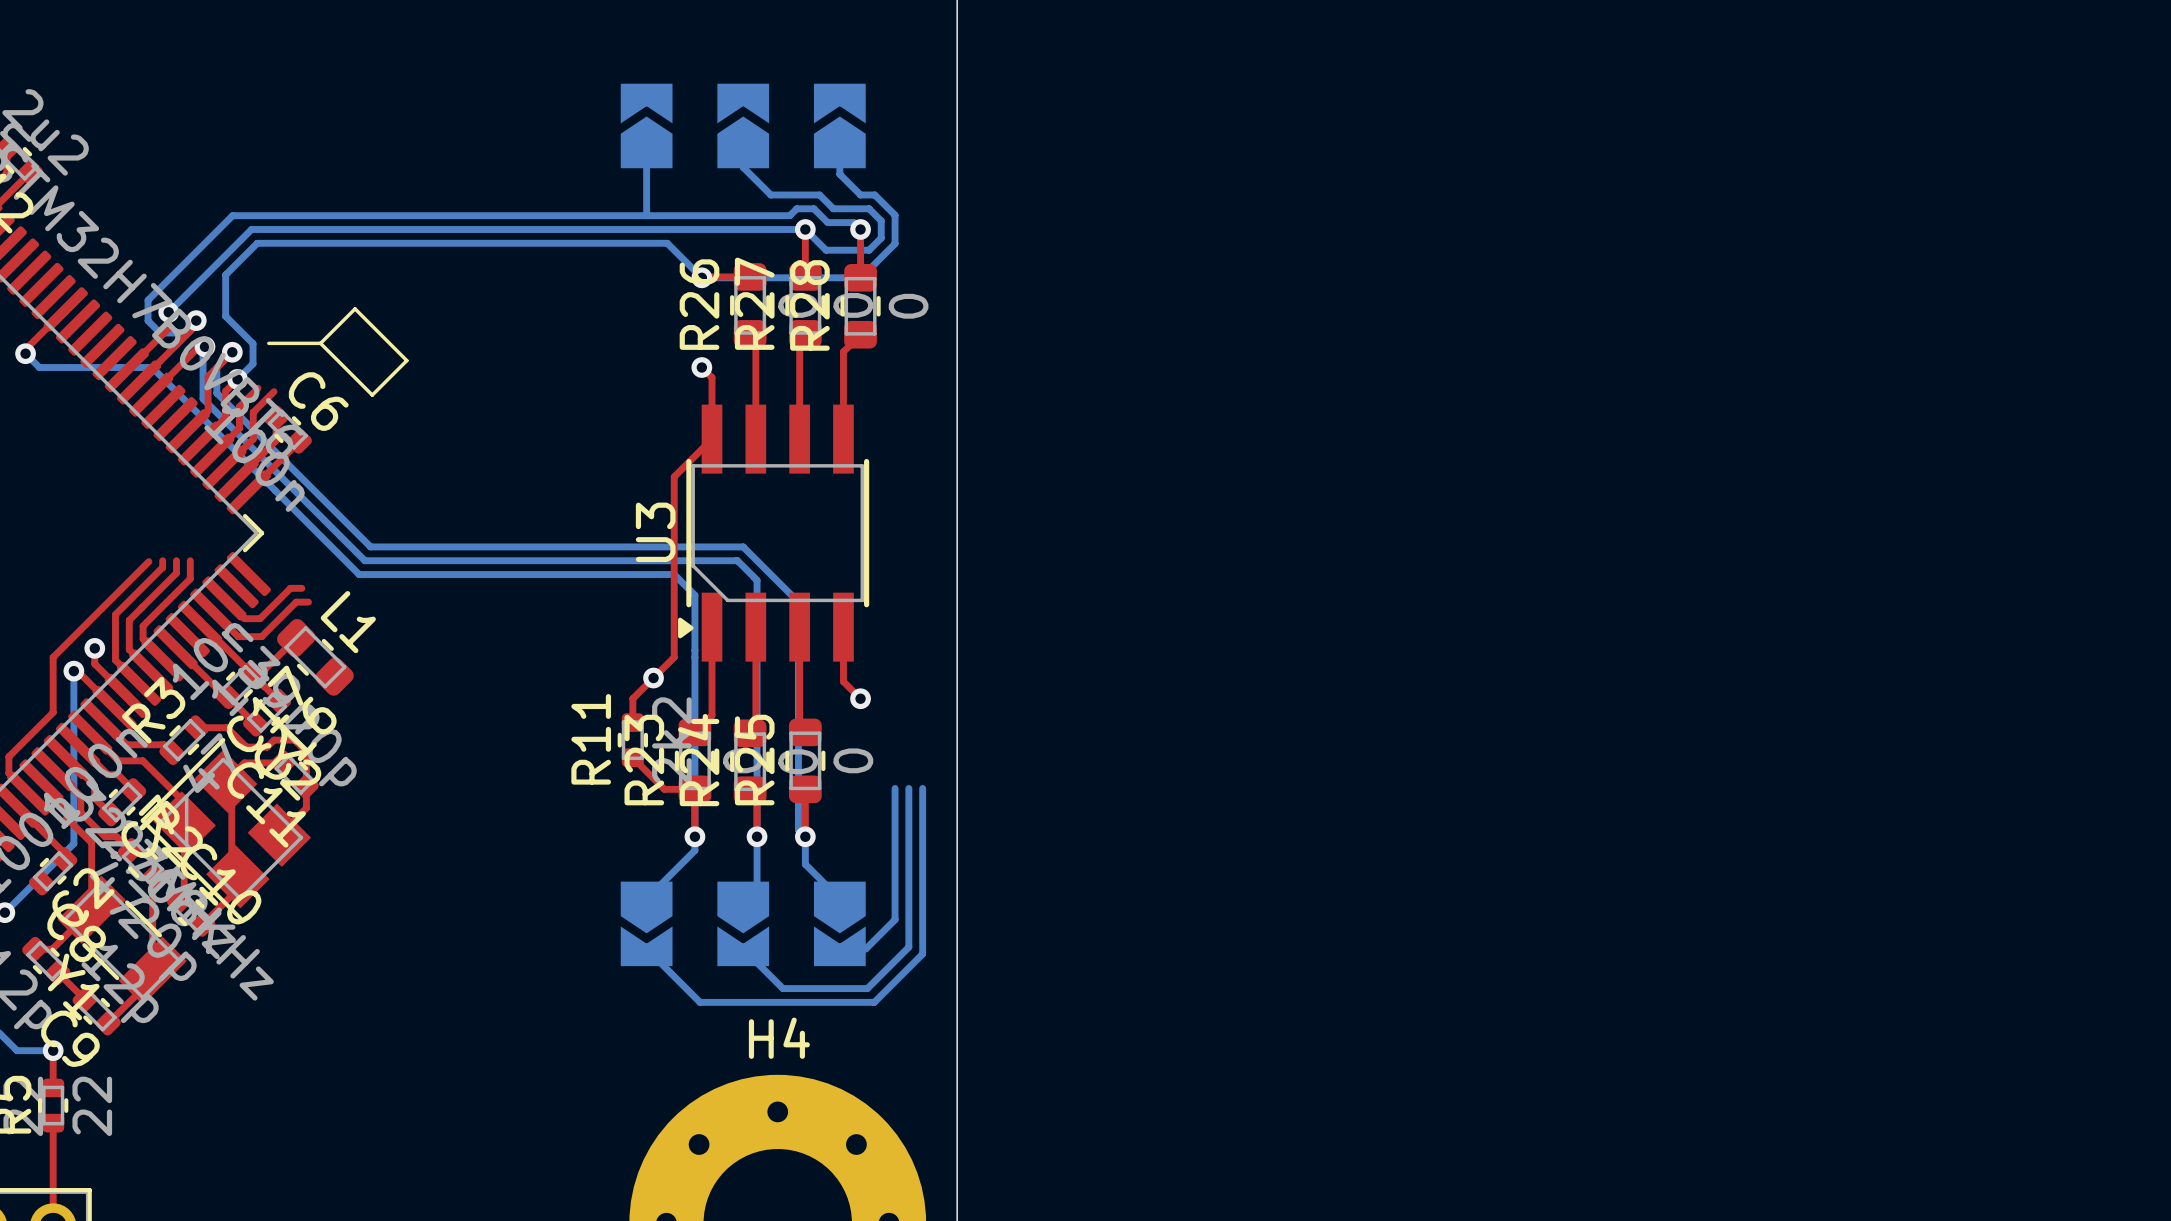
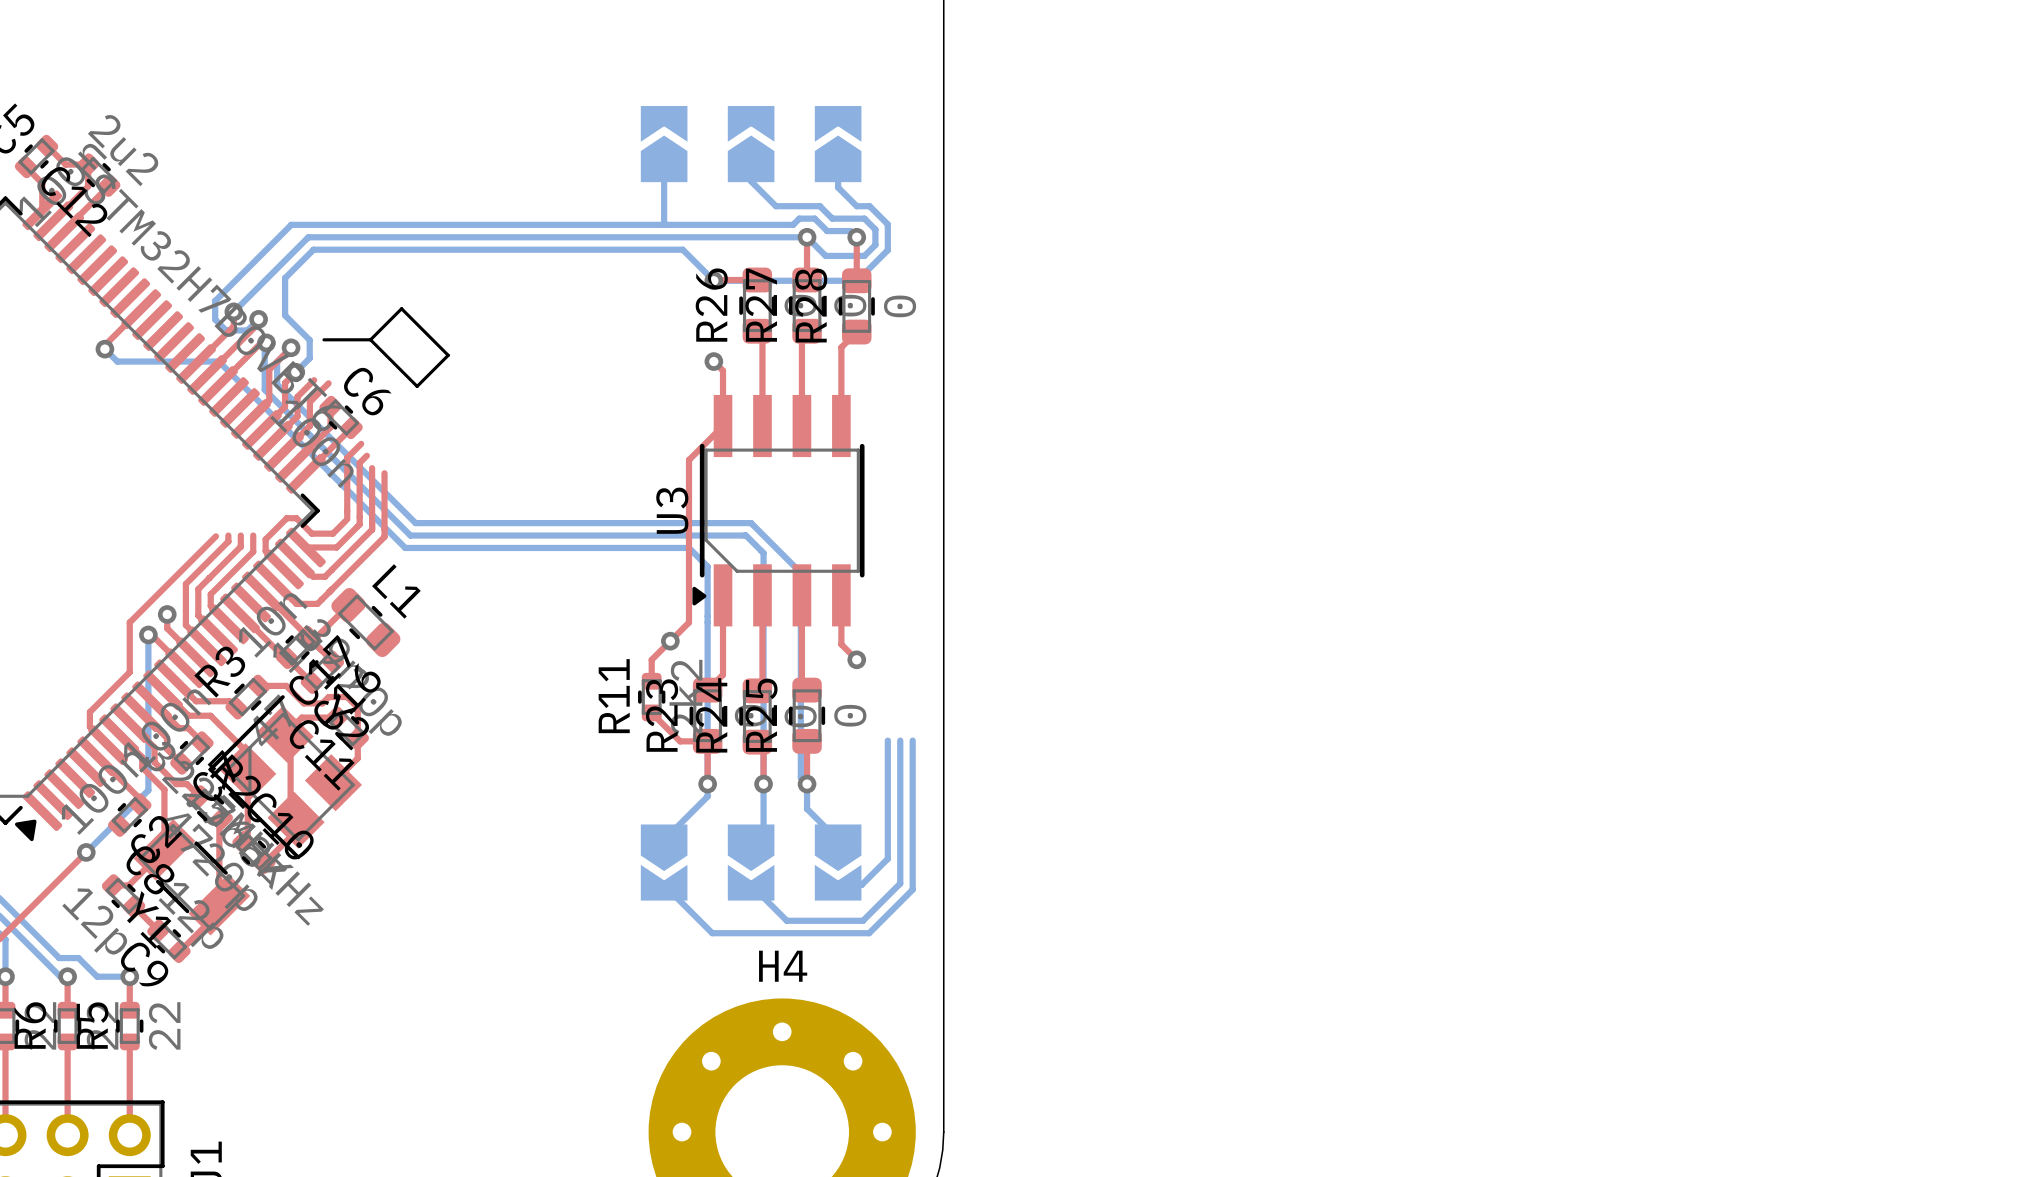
top track: none -> (361, 443) (347, 457) (347, 519)
top track: none -> (366, 455) (359, 462) (359, 524) (336, 547) (305, 547)
top track: none -> (372, 468) (372, 529) (324, 576) (313, 576) (294, 558)
top track: (301, 588) (290, 588) (260, 618) (244, 618) (224, 598) -> (345, 521) (332, 533) (311, 533) (296, 518) (286, 518) (265, 539) (265, 551) (283, 569)
top track: (296, 602) (308, 602) -> (348, 572) (384, 536) (384, 473)

